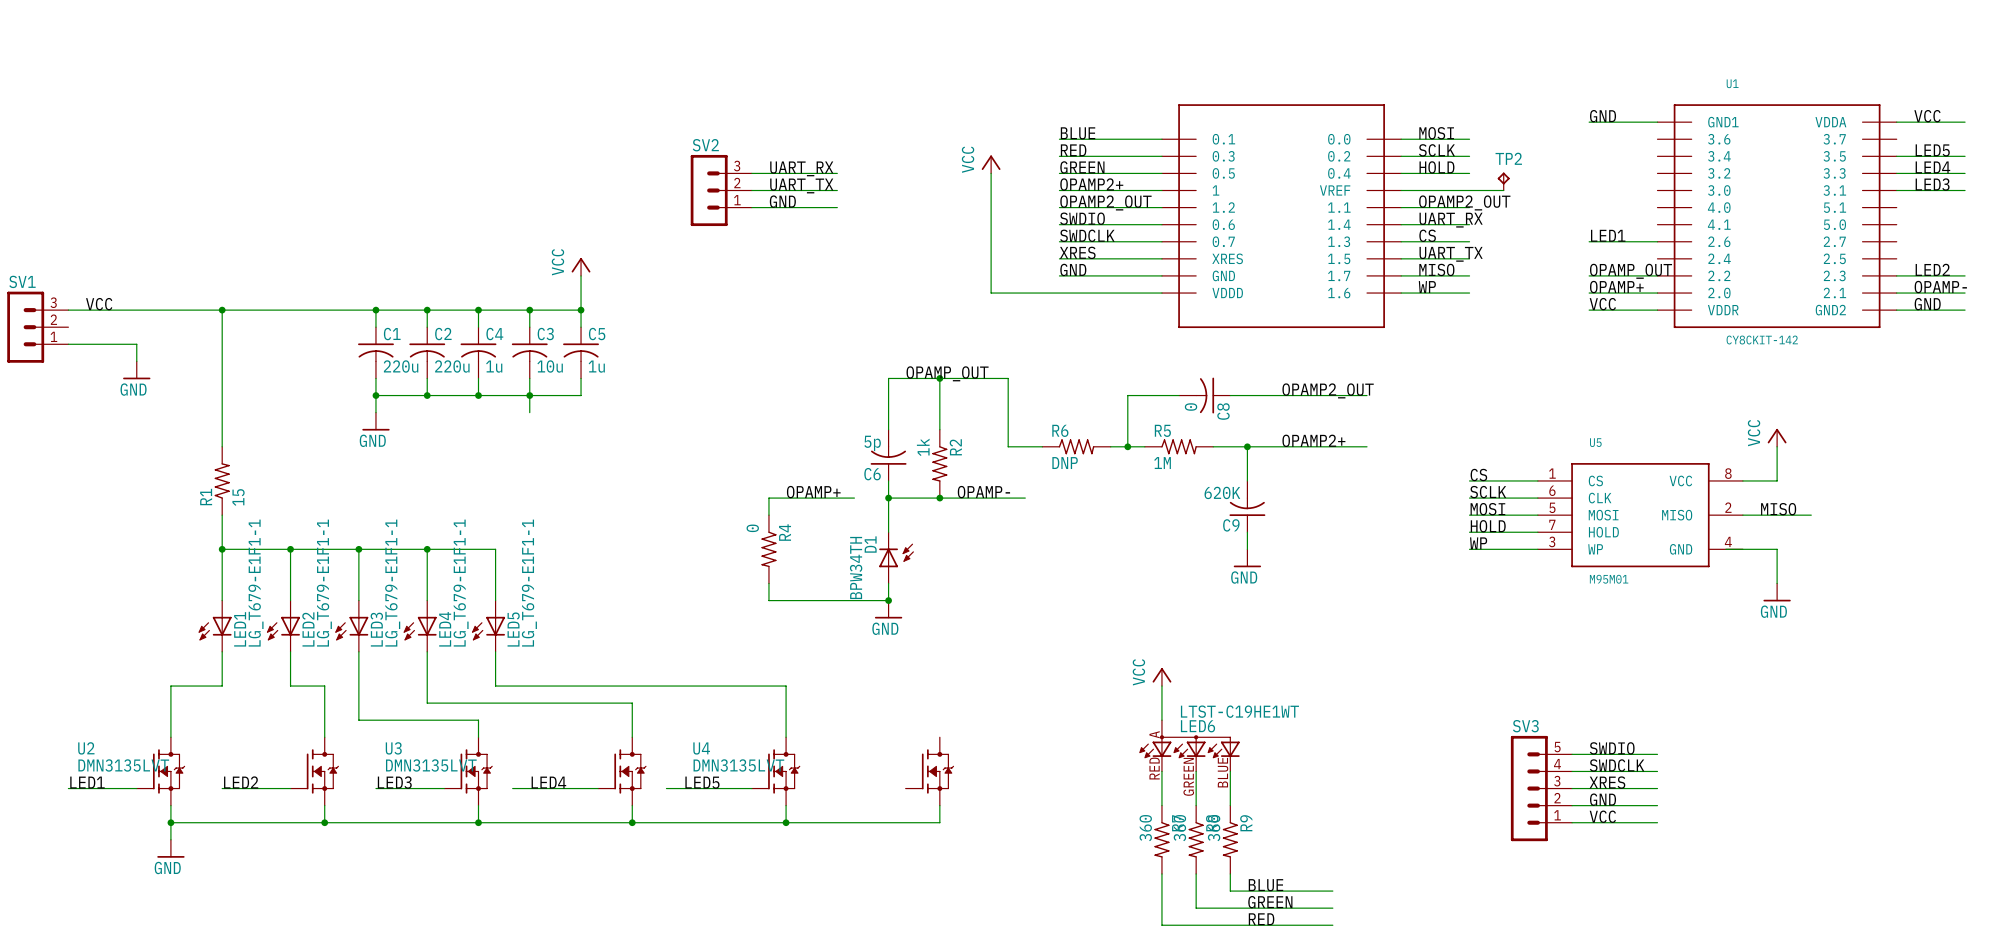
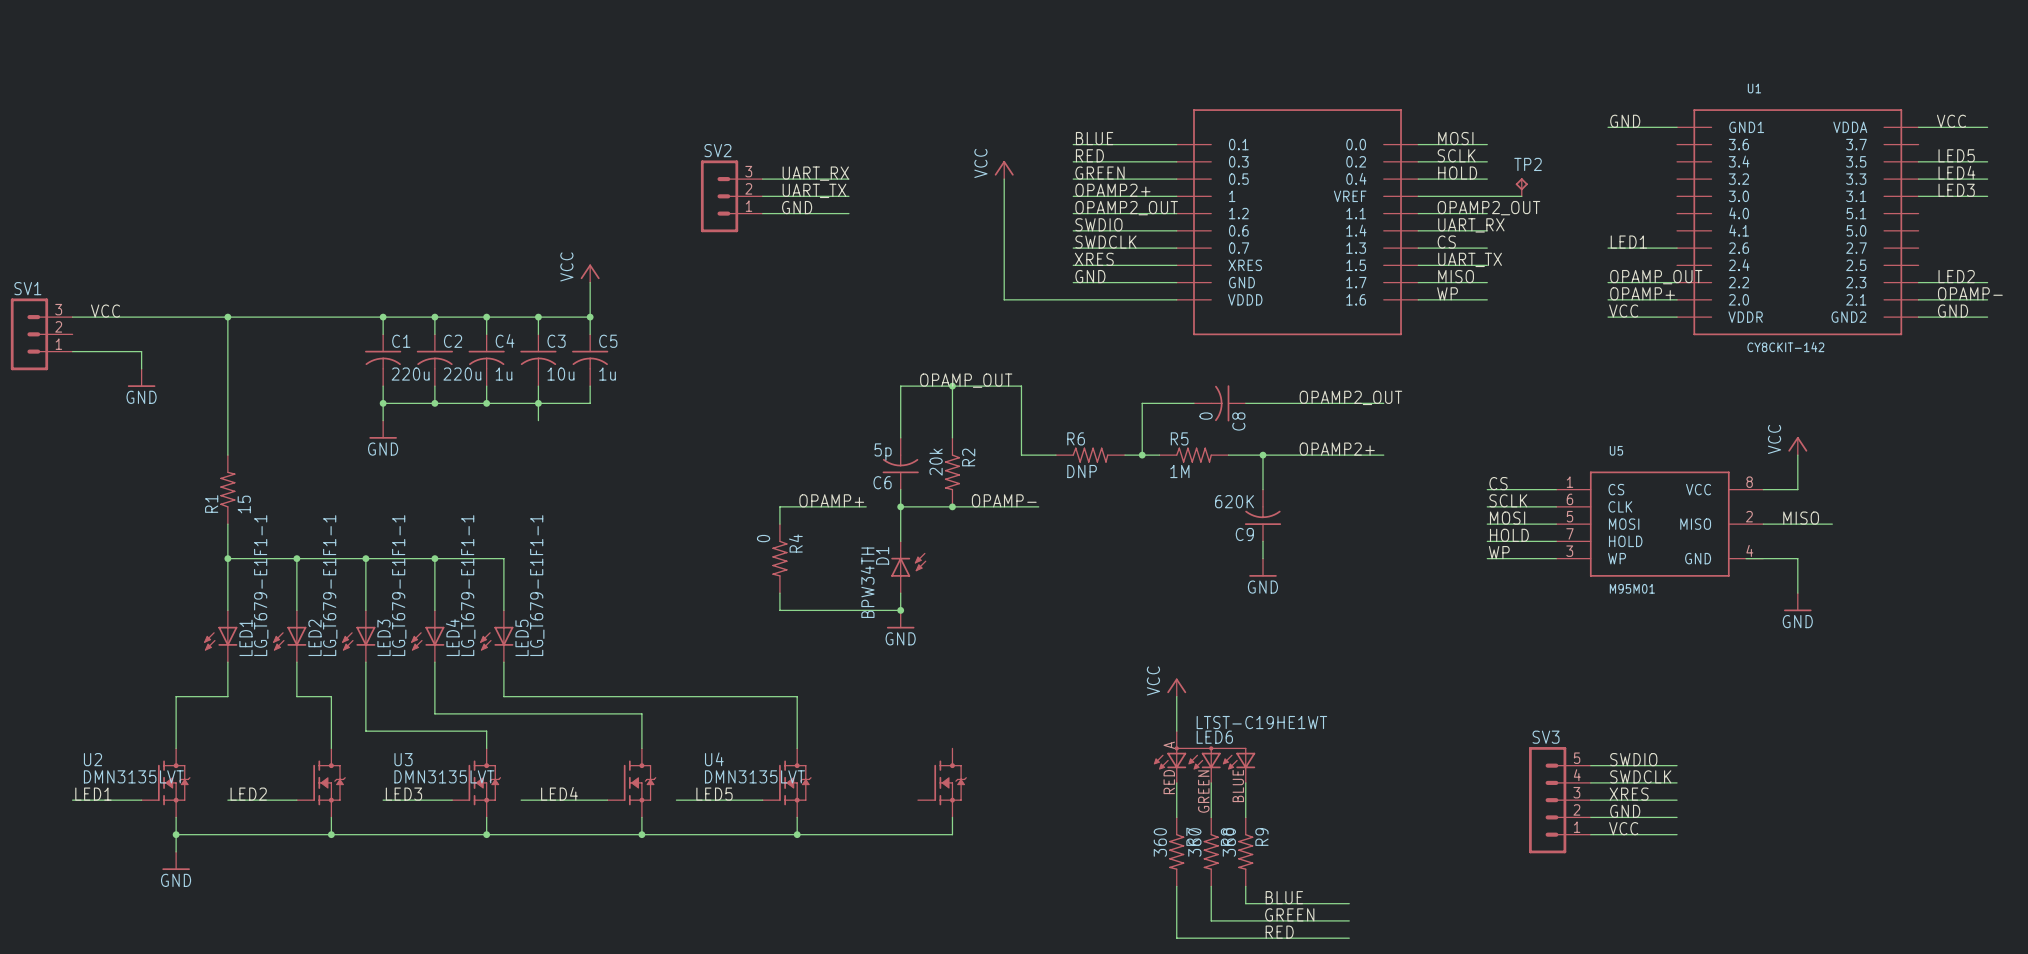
R2 value: 1k (923, 447) -> 20k (936, 462)

